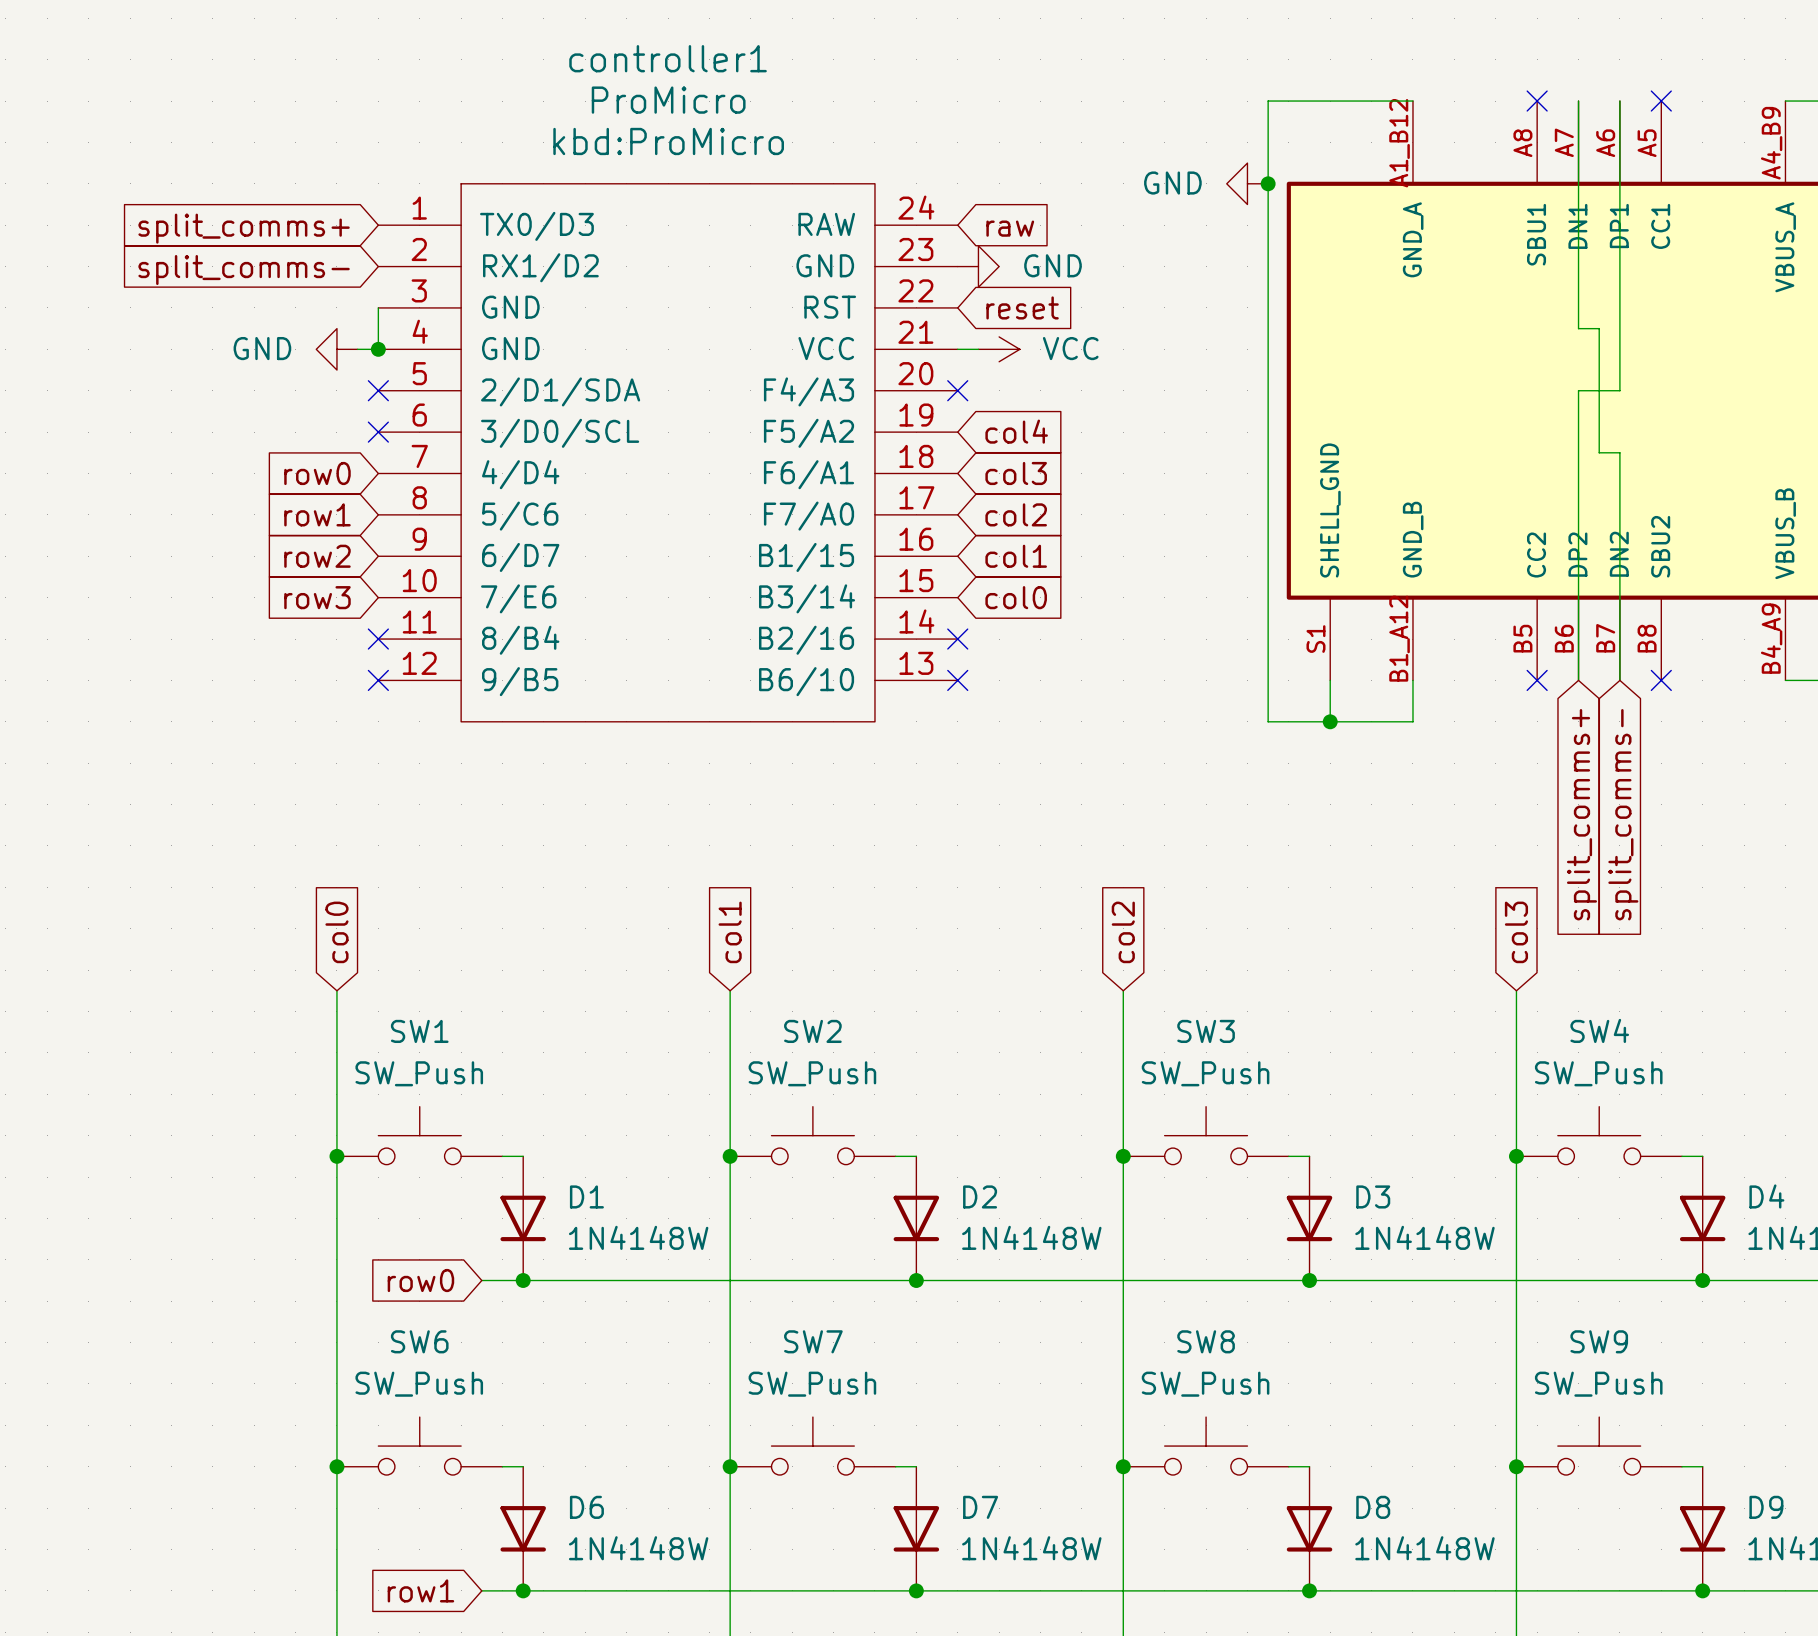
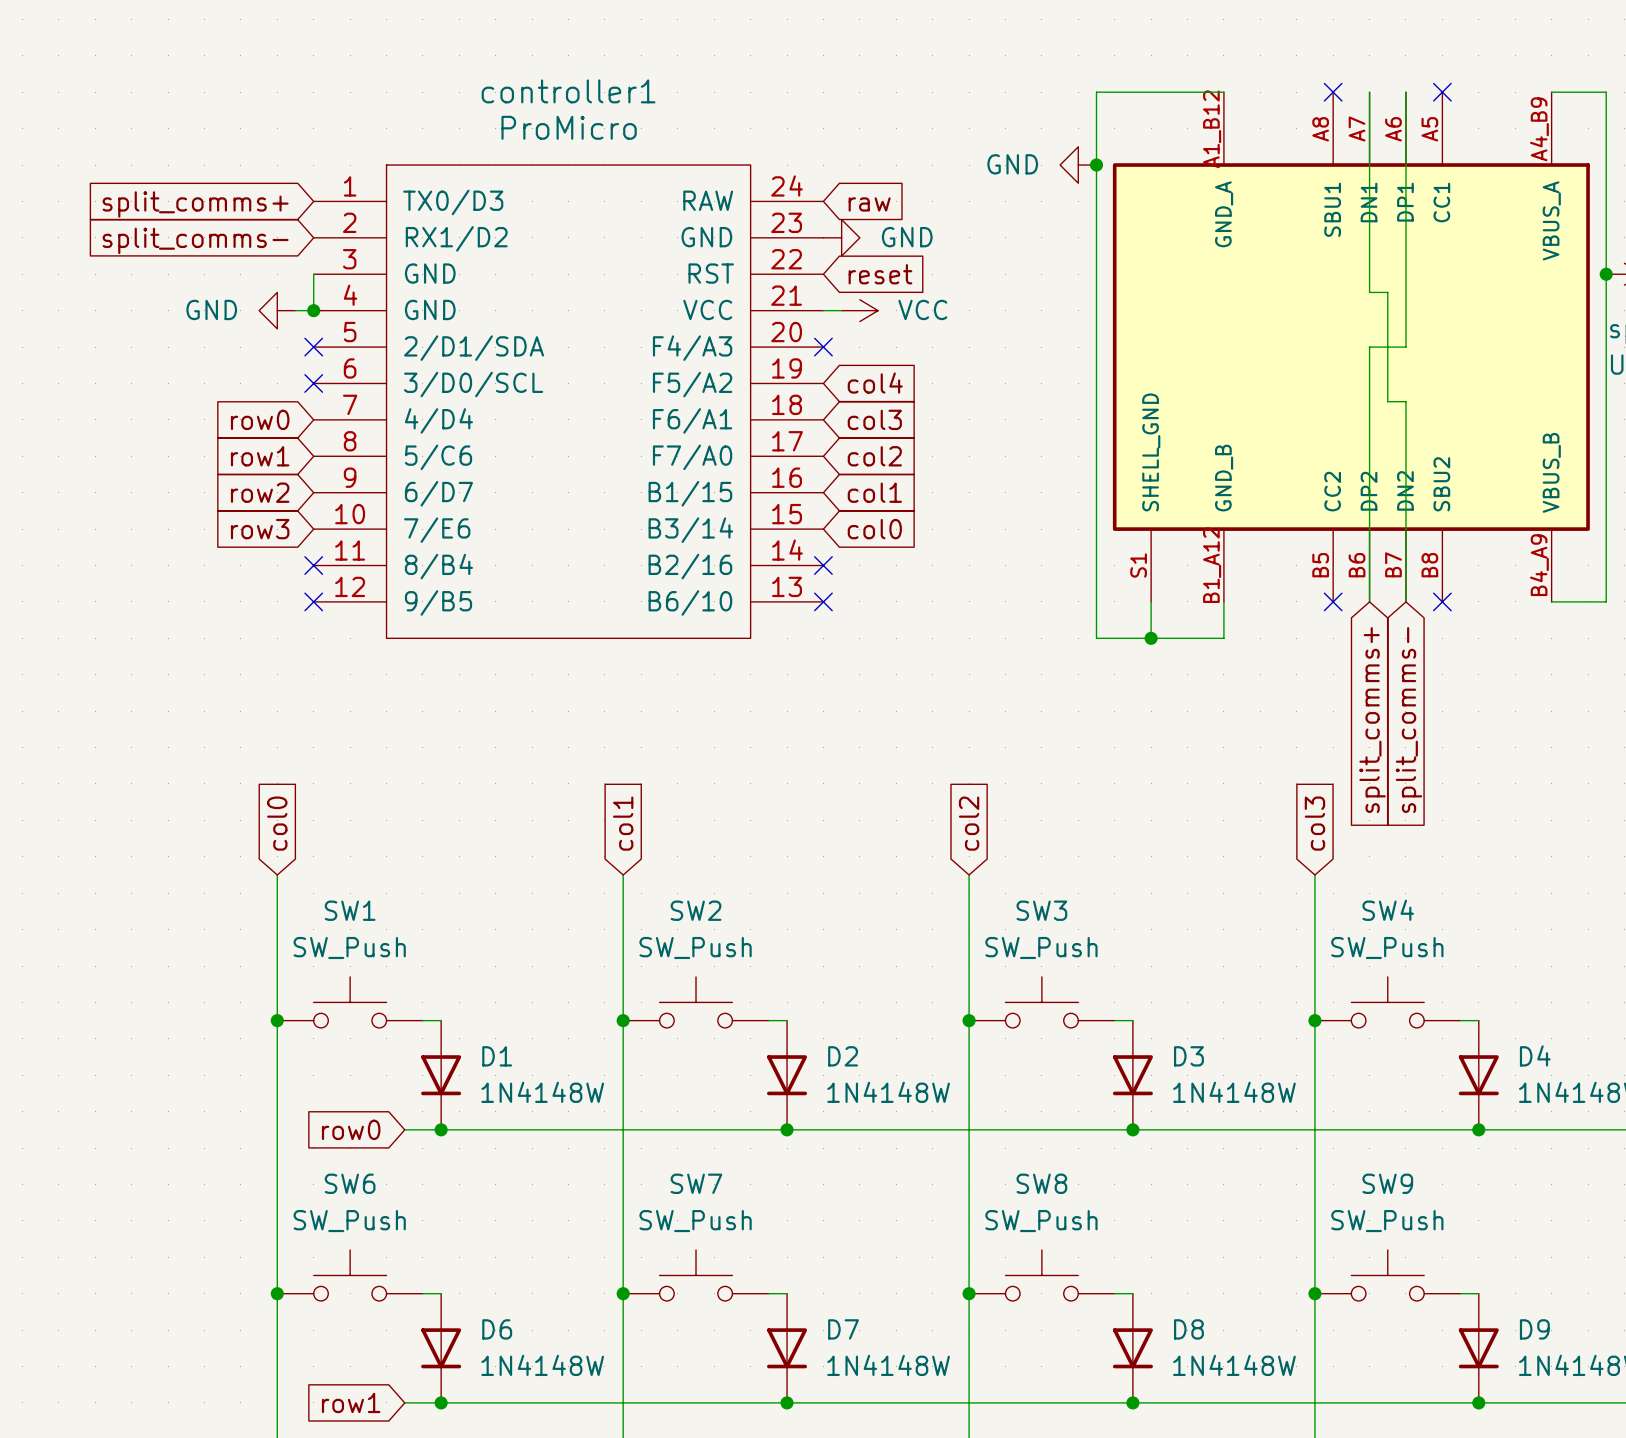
controller1 name position: controller1 (668, 58) -> controller1 (568, 91)
controller1 value position: ProMicro (668, 100) -> ProMicro (569, 127)
controller1 text: kbd:ProMicro (668, 141) -> none

